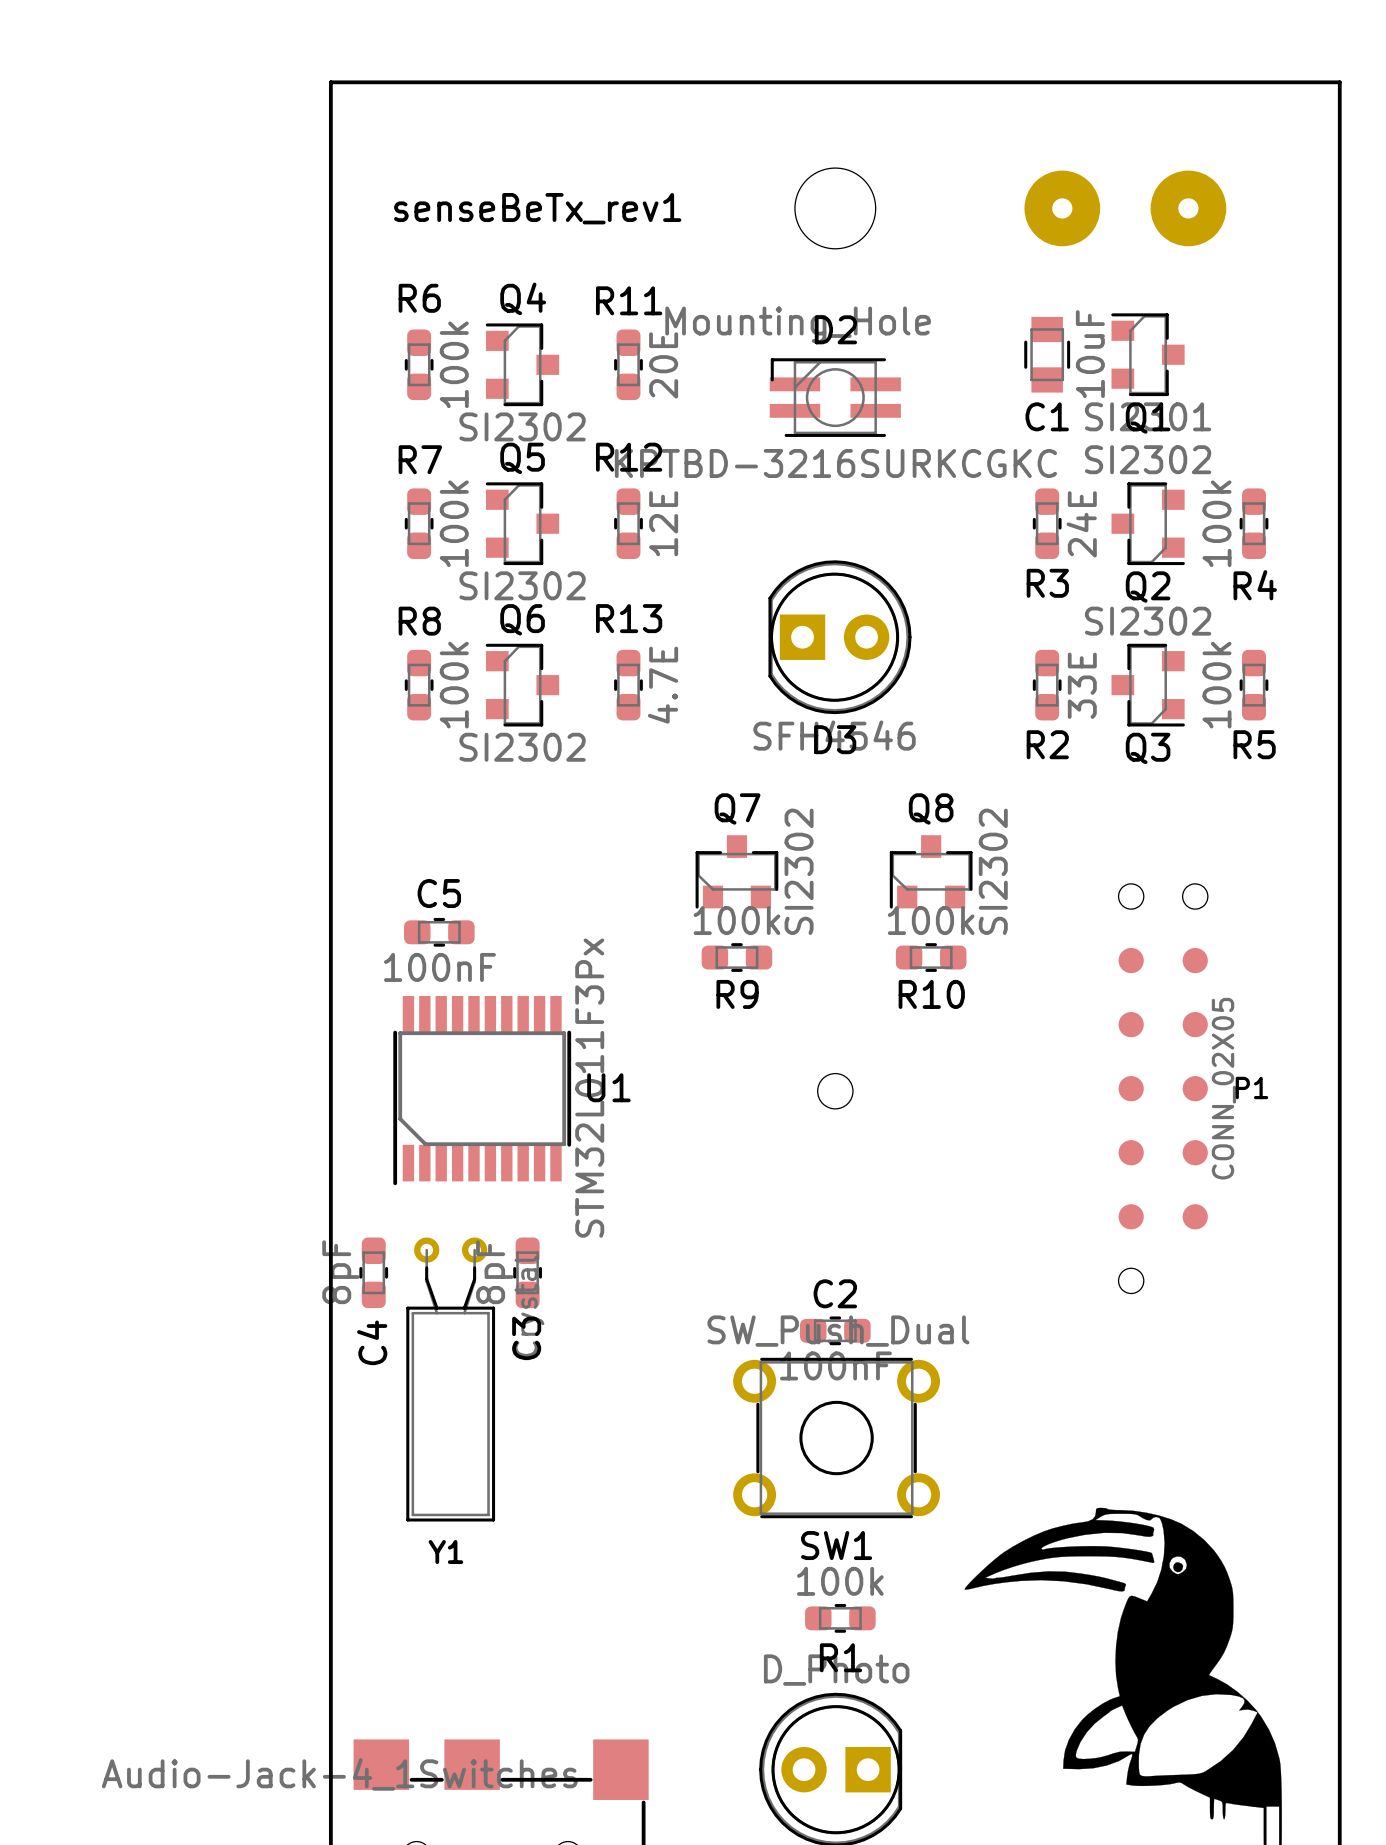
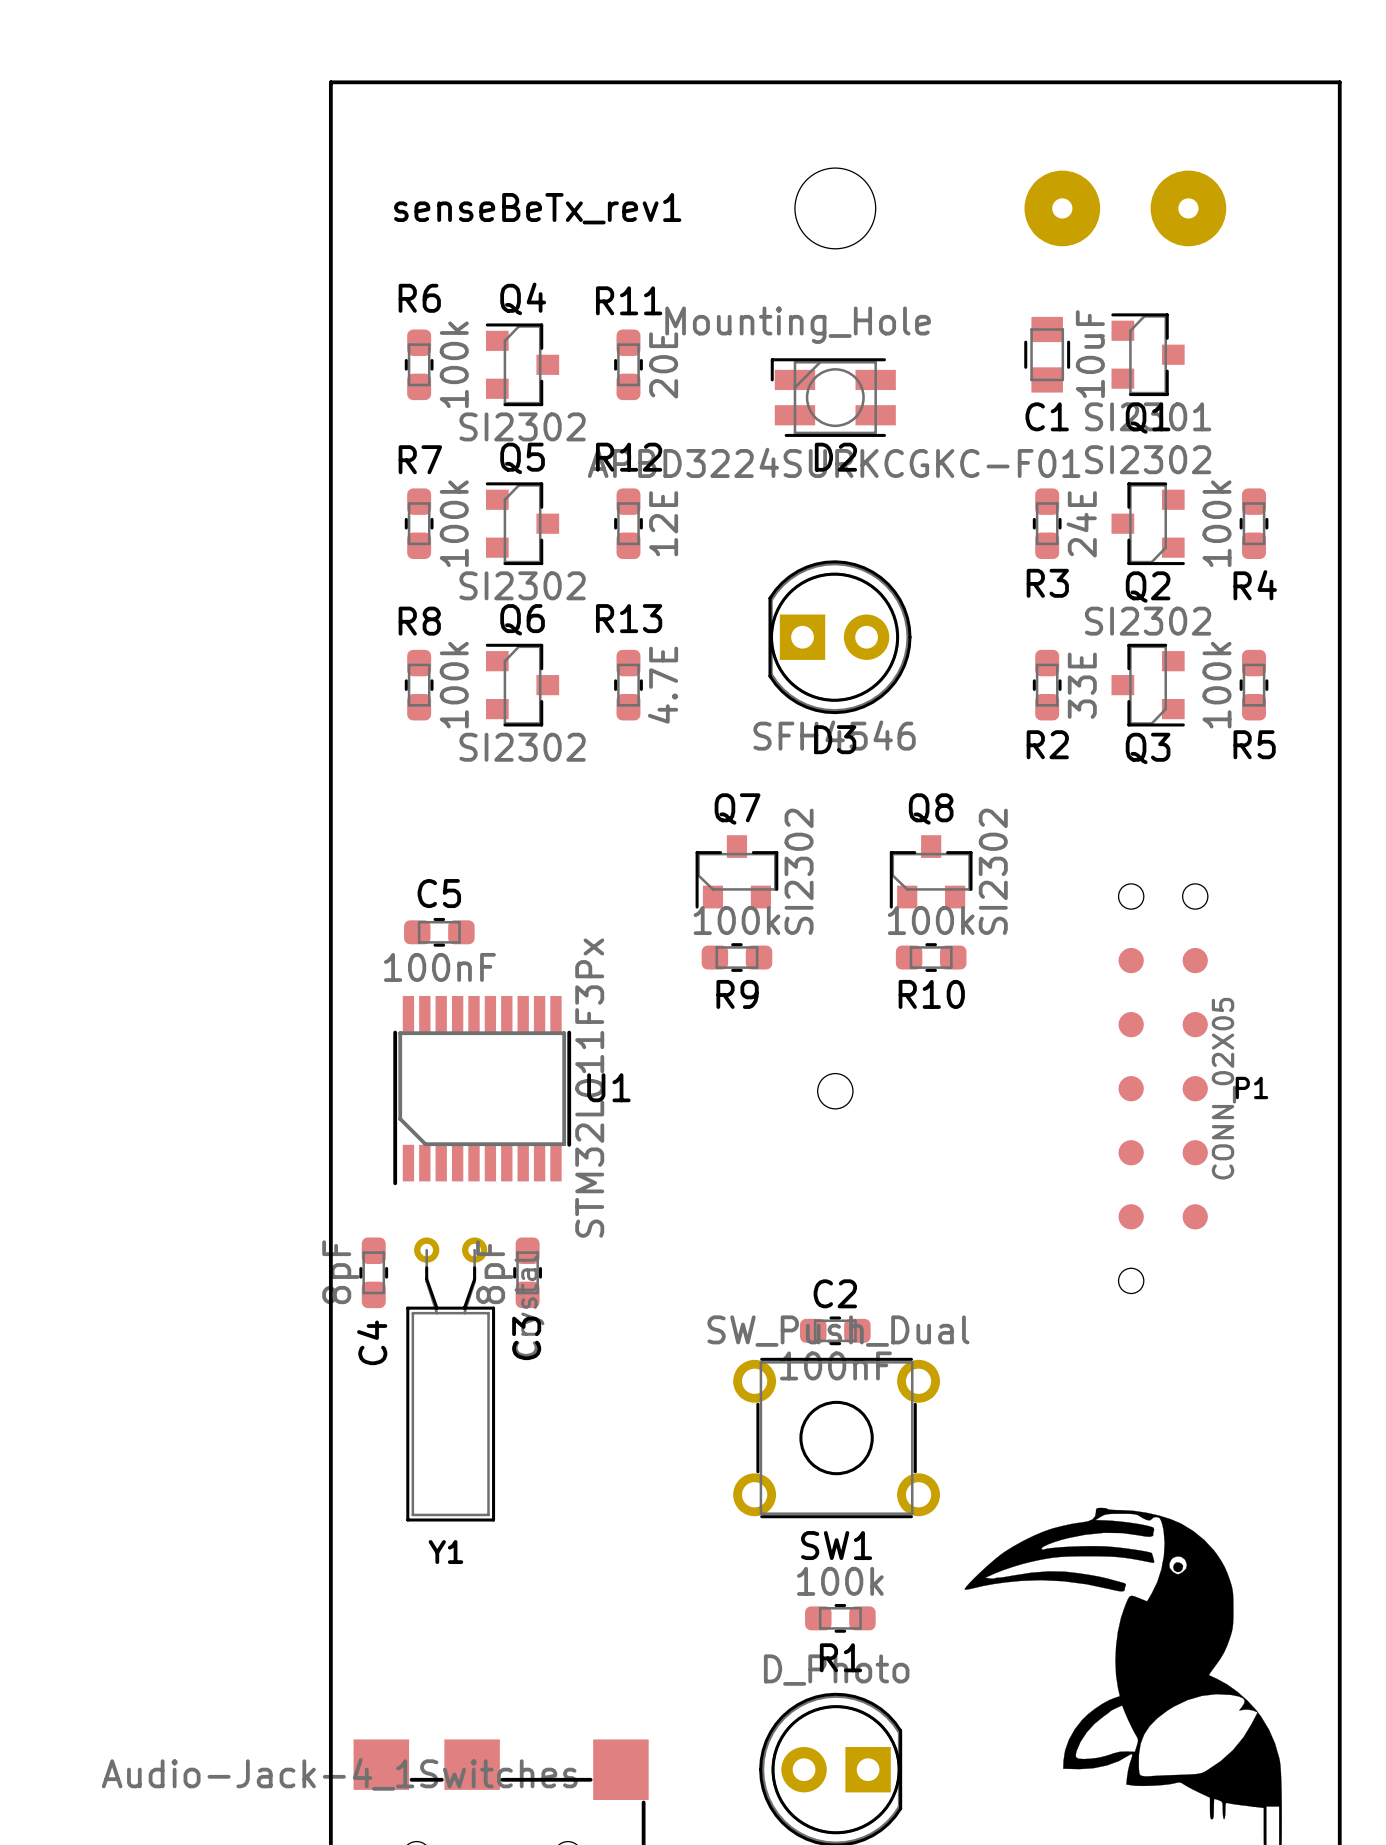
D2 name position: D2 (835, 329) -> D2 (835, 457)
D2 footprint: [769, 358, 901, 437] -> [770, 358, 896, 437]
D2 value: KPTBD-3216SURKCGKC (835, 463) -> APBD3224SURKCGKC-F01 (834, 462)

